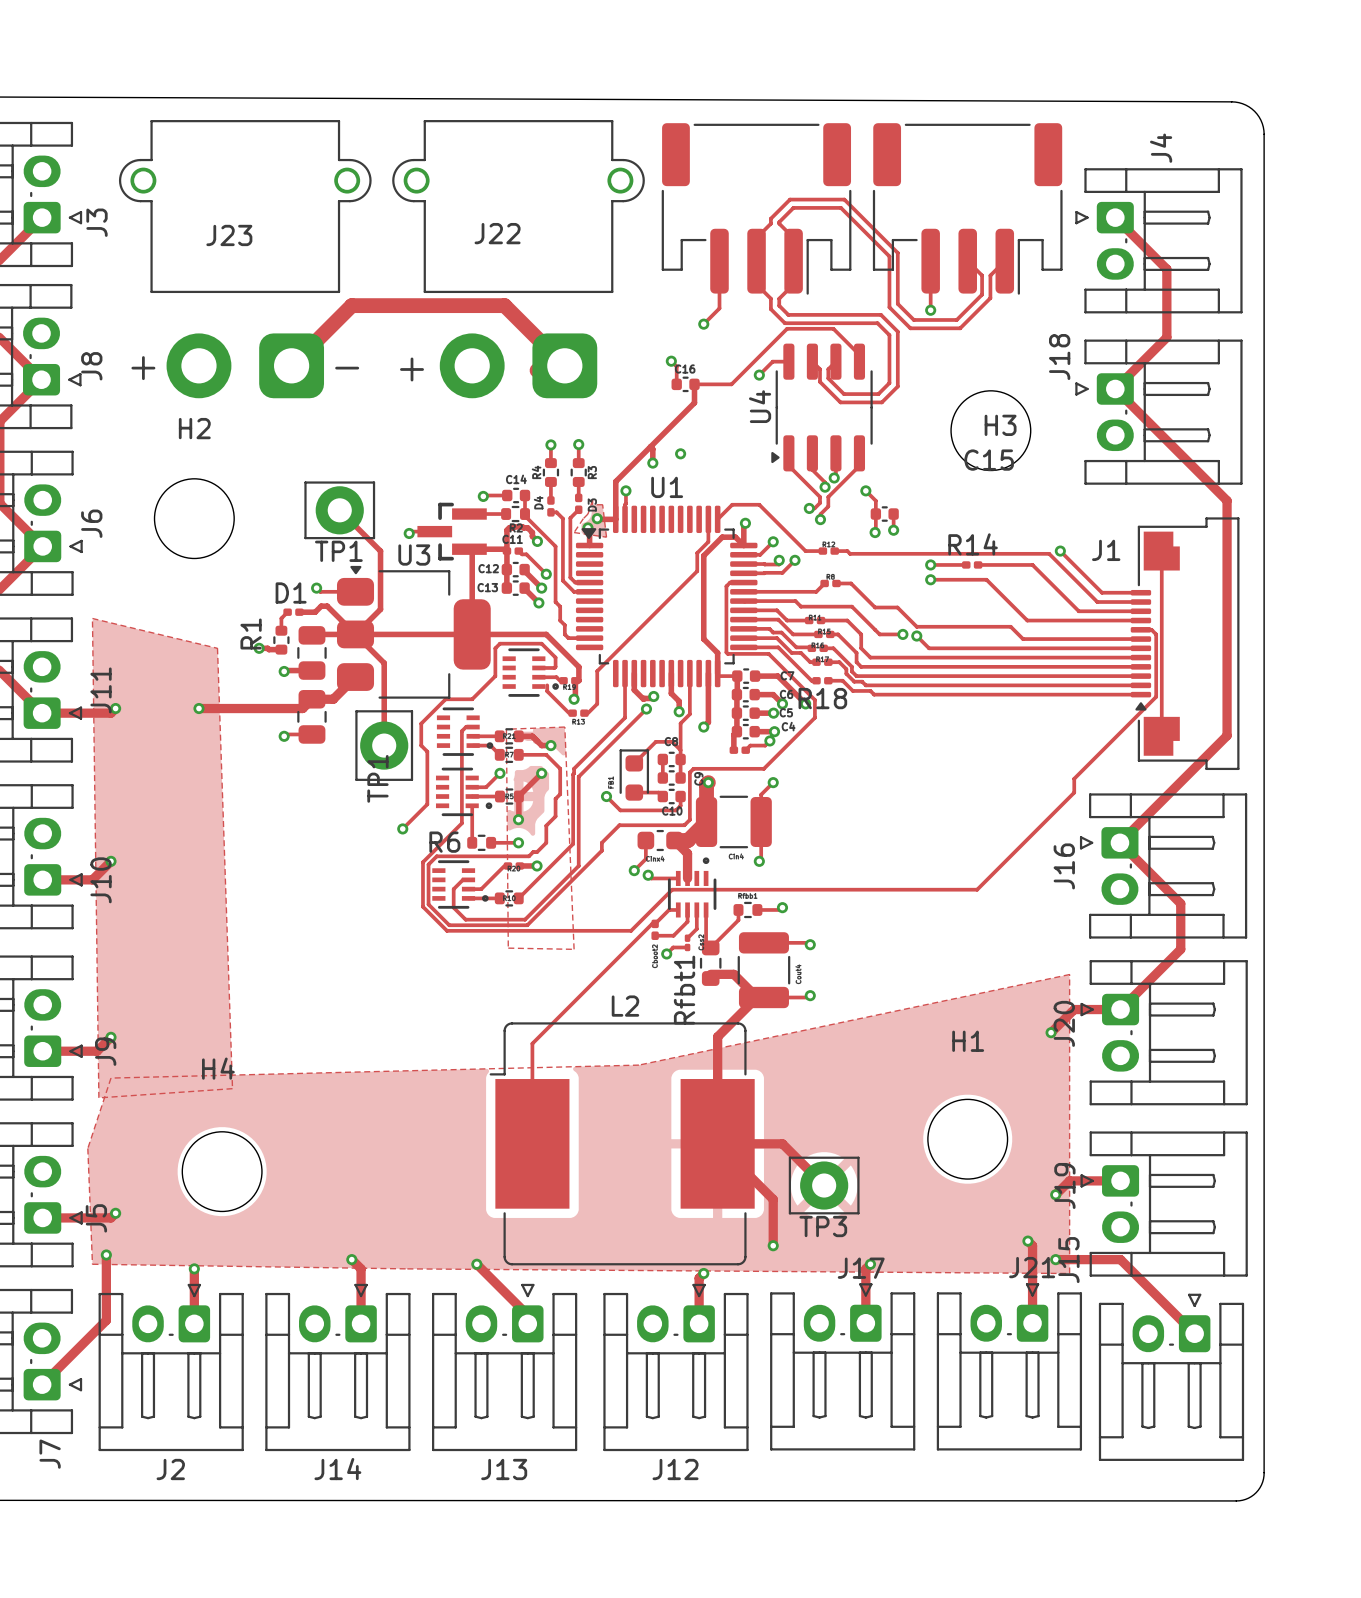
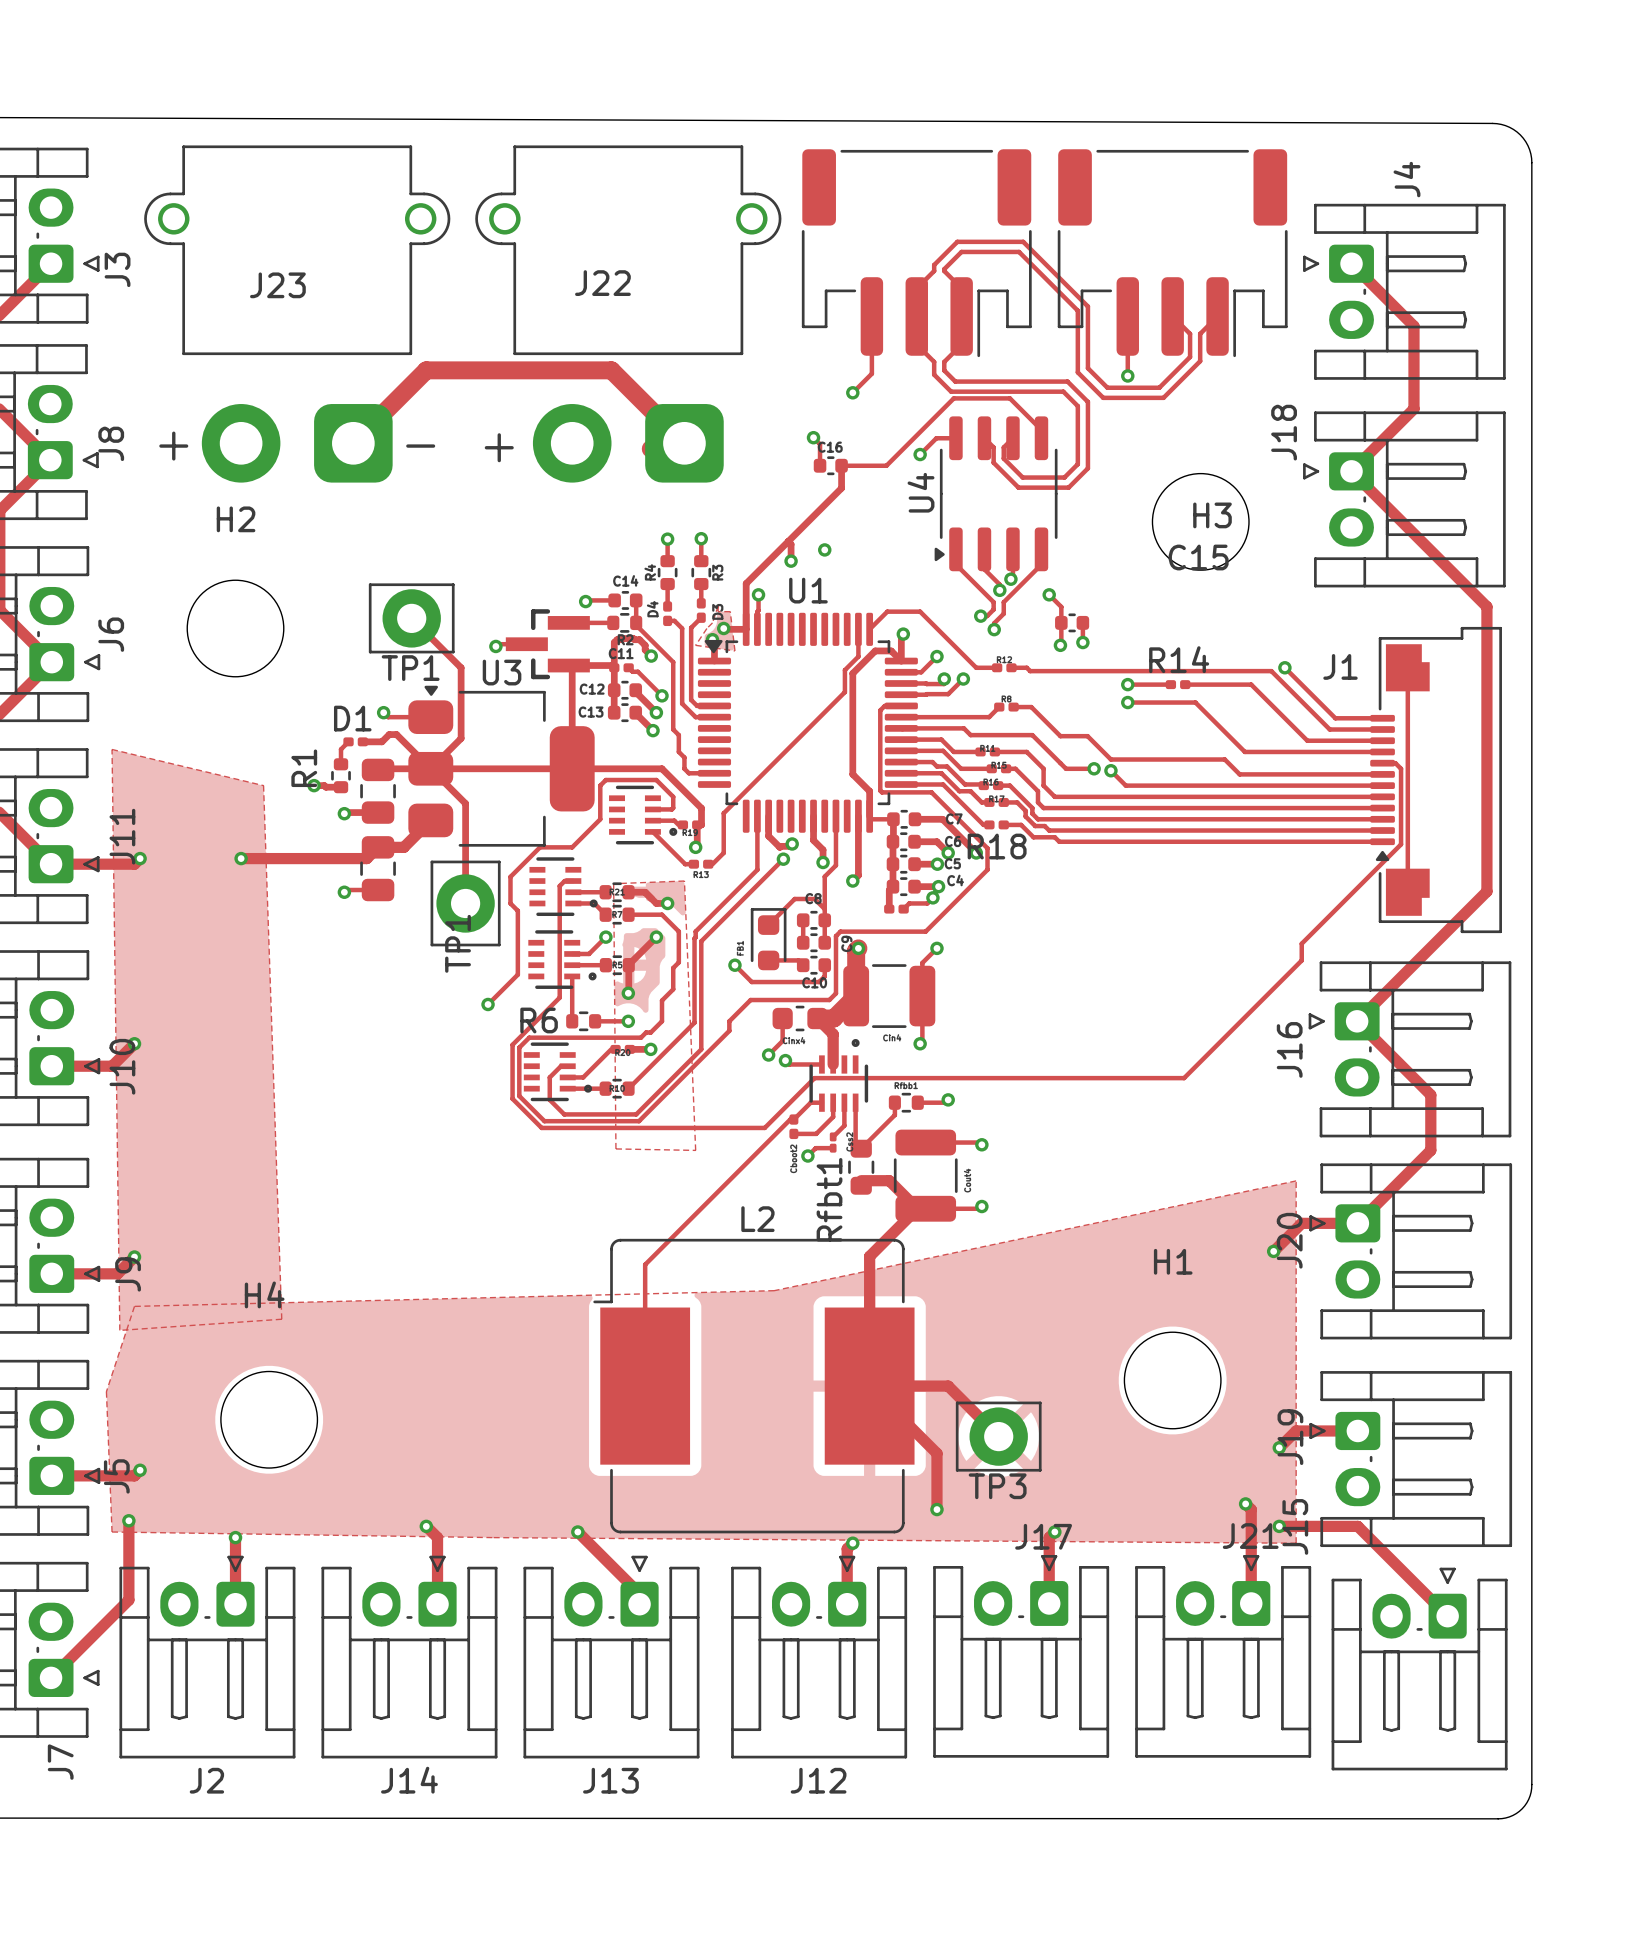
track: (547, 685) (547, 691) (569, 713) -> none
track: none -> (652, 831) (685, 864) (693, 864)

